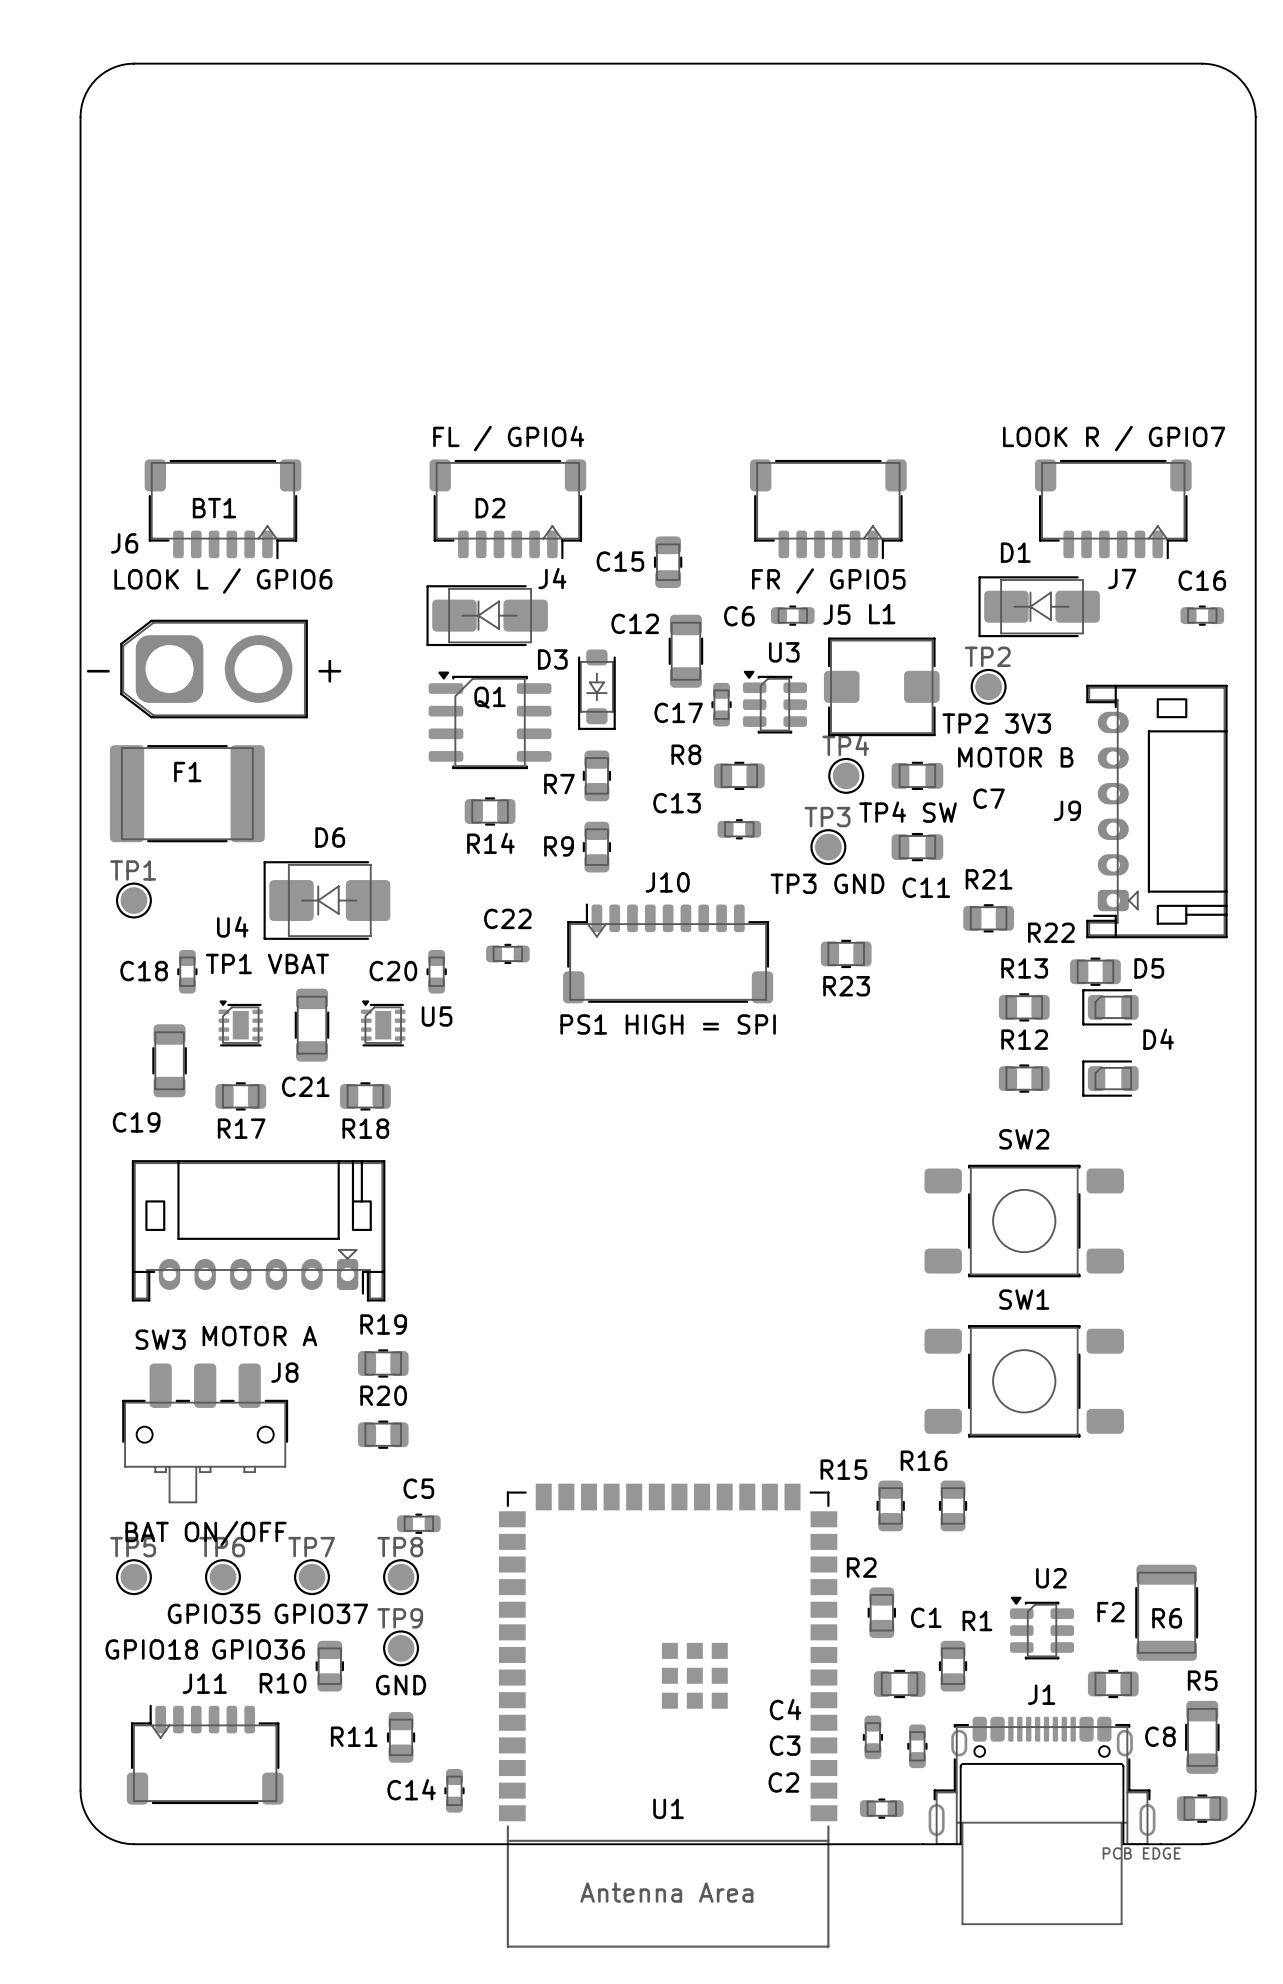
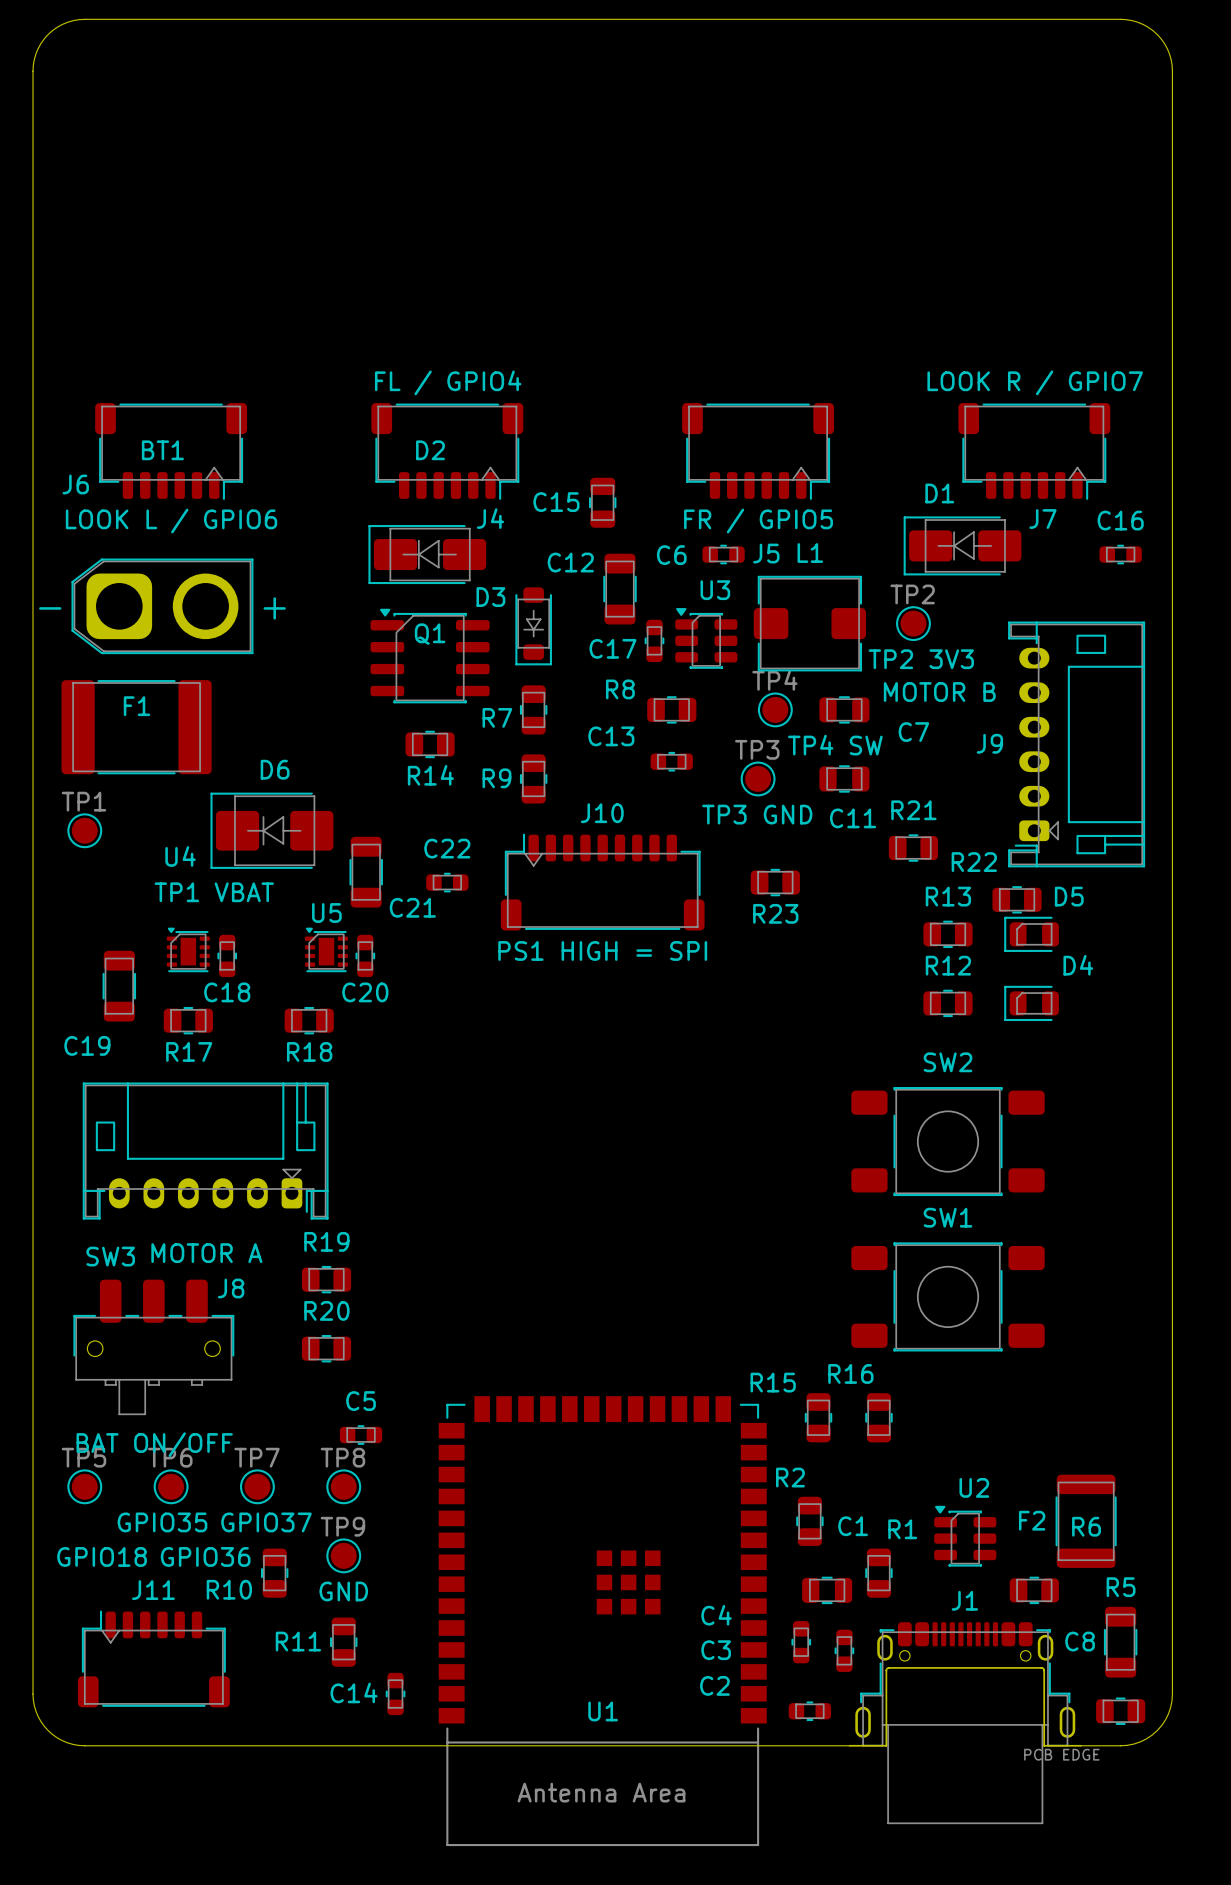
C18 name position: C18 (144, 971) -> C18 (227, 992)
C18 position: (187, 971) -> (227, 955)
C20 name position: C20 (393, 971) -> C20 (365, 992)
C20 position: (436, 971) -> (365, 955)
U5 name position: U5 (437, 1016) -> U5 (326, 912)
C21 position: (312, 1025) -> (366, 872)
C21 name position: C21 (305, 1086) -> C21 (412, 907)

